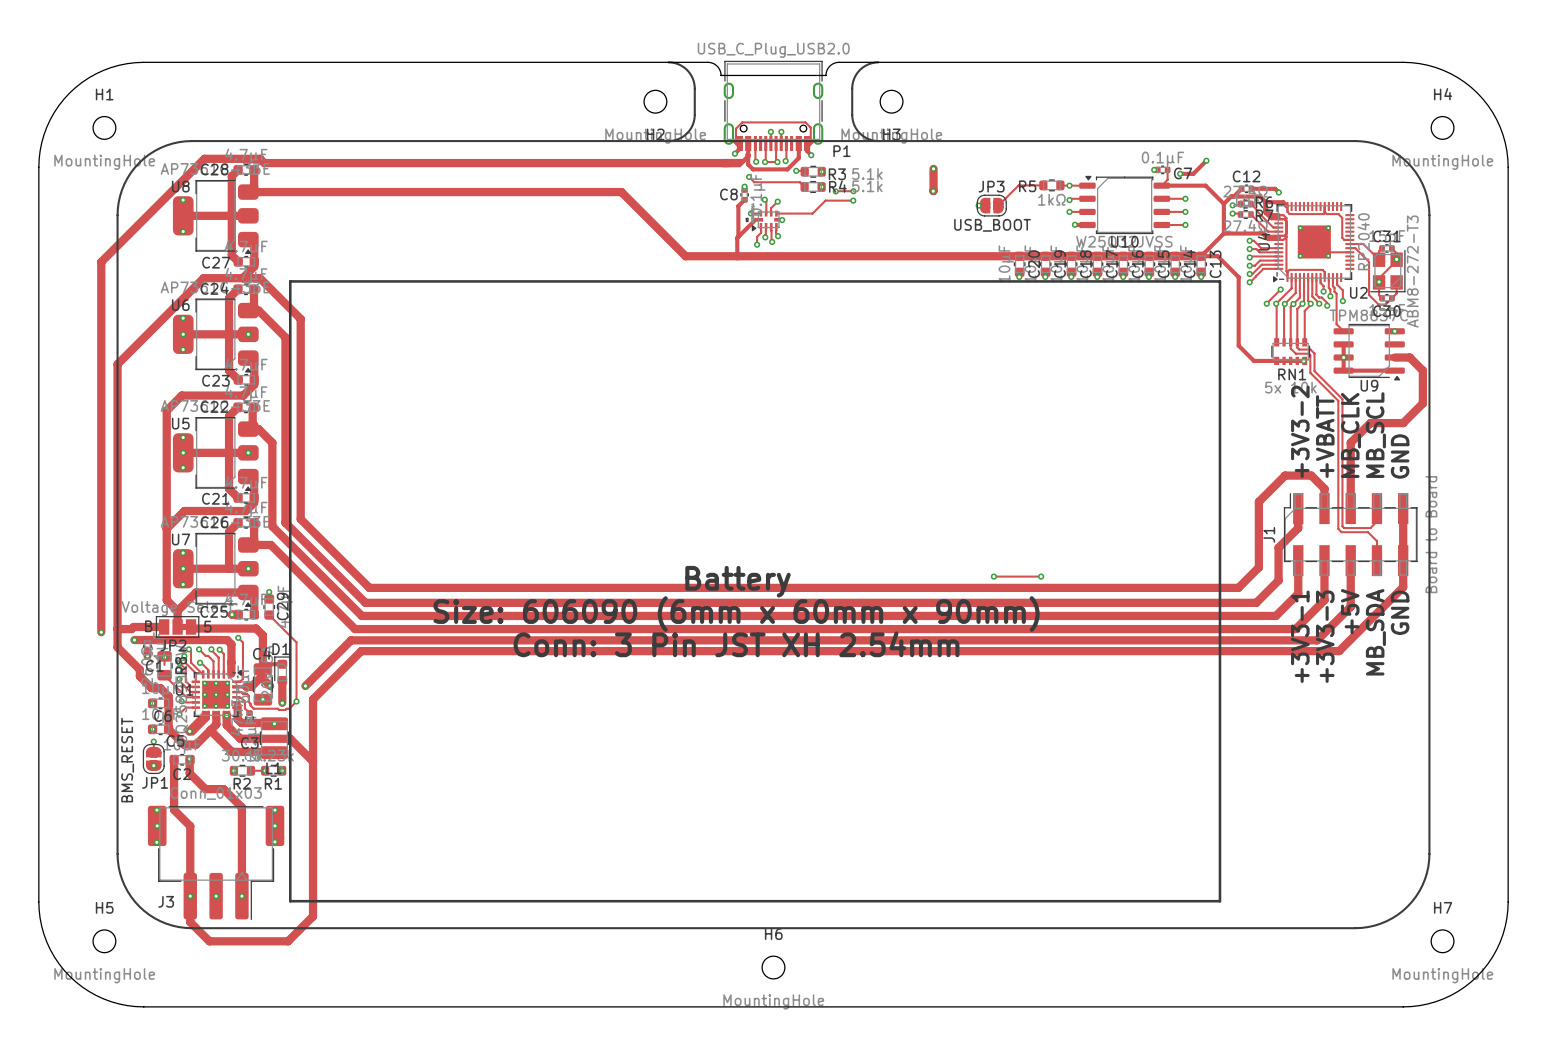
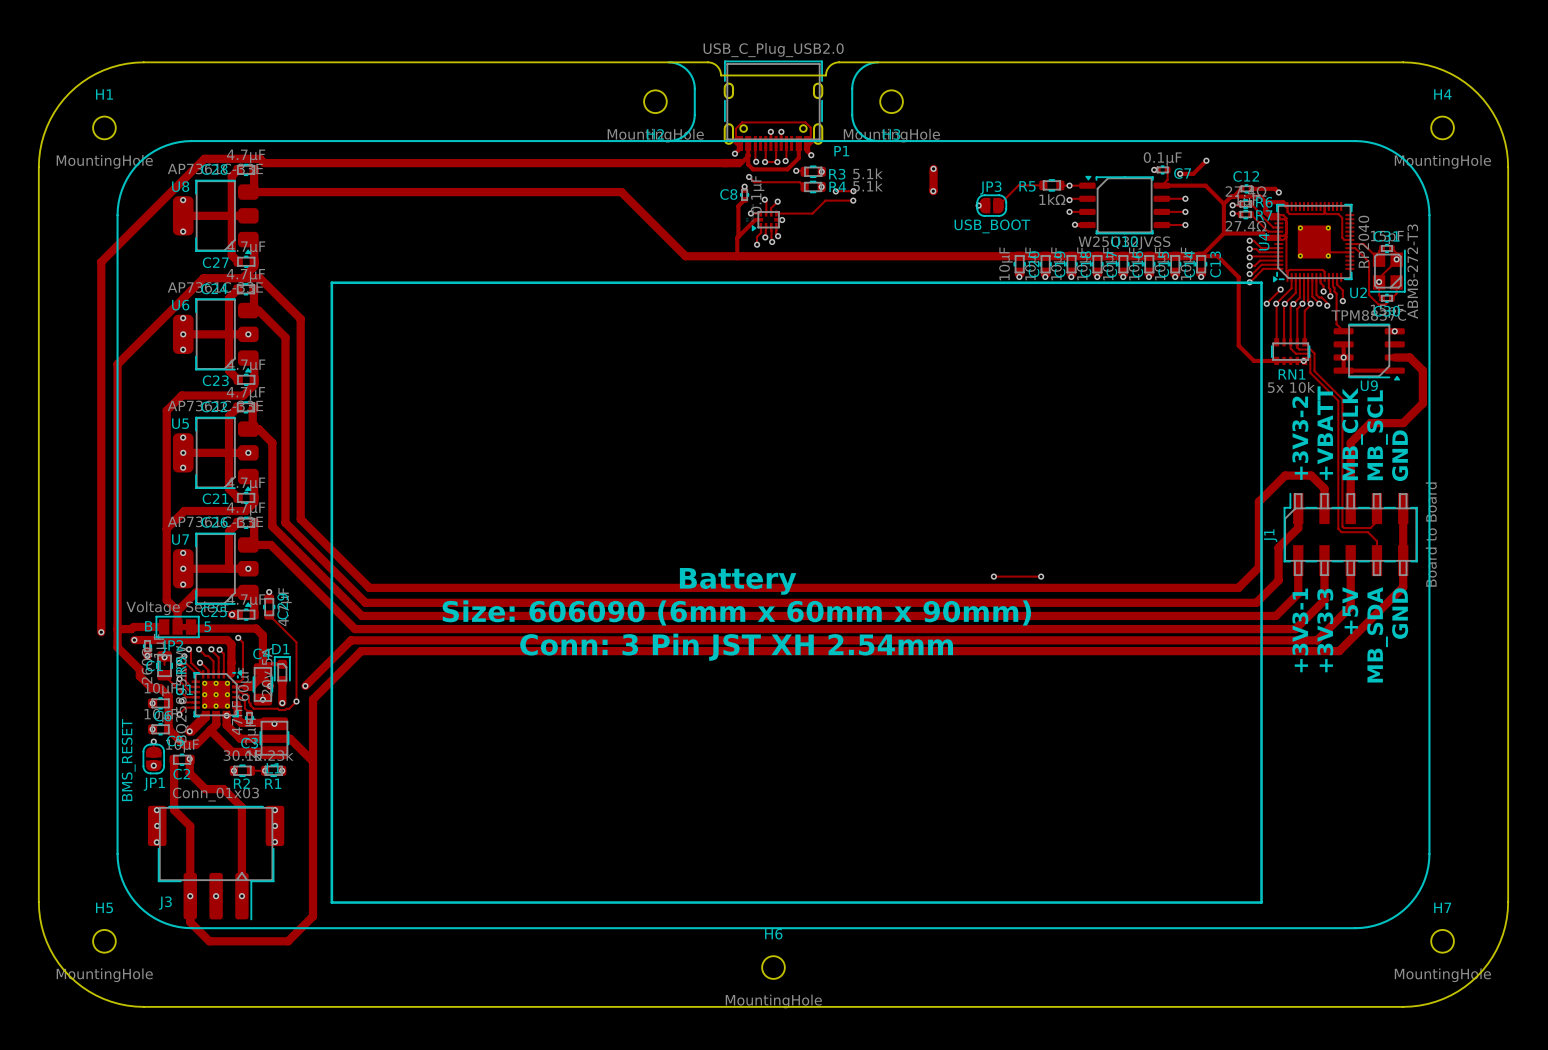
line: (290, 281) (1219, 281) (1219, 901) (290, 901) (290, 281) -> (331, 282) (331, 902) (1261, 902) (1261, 282) (331, 282)

